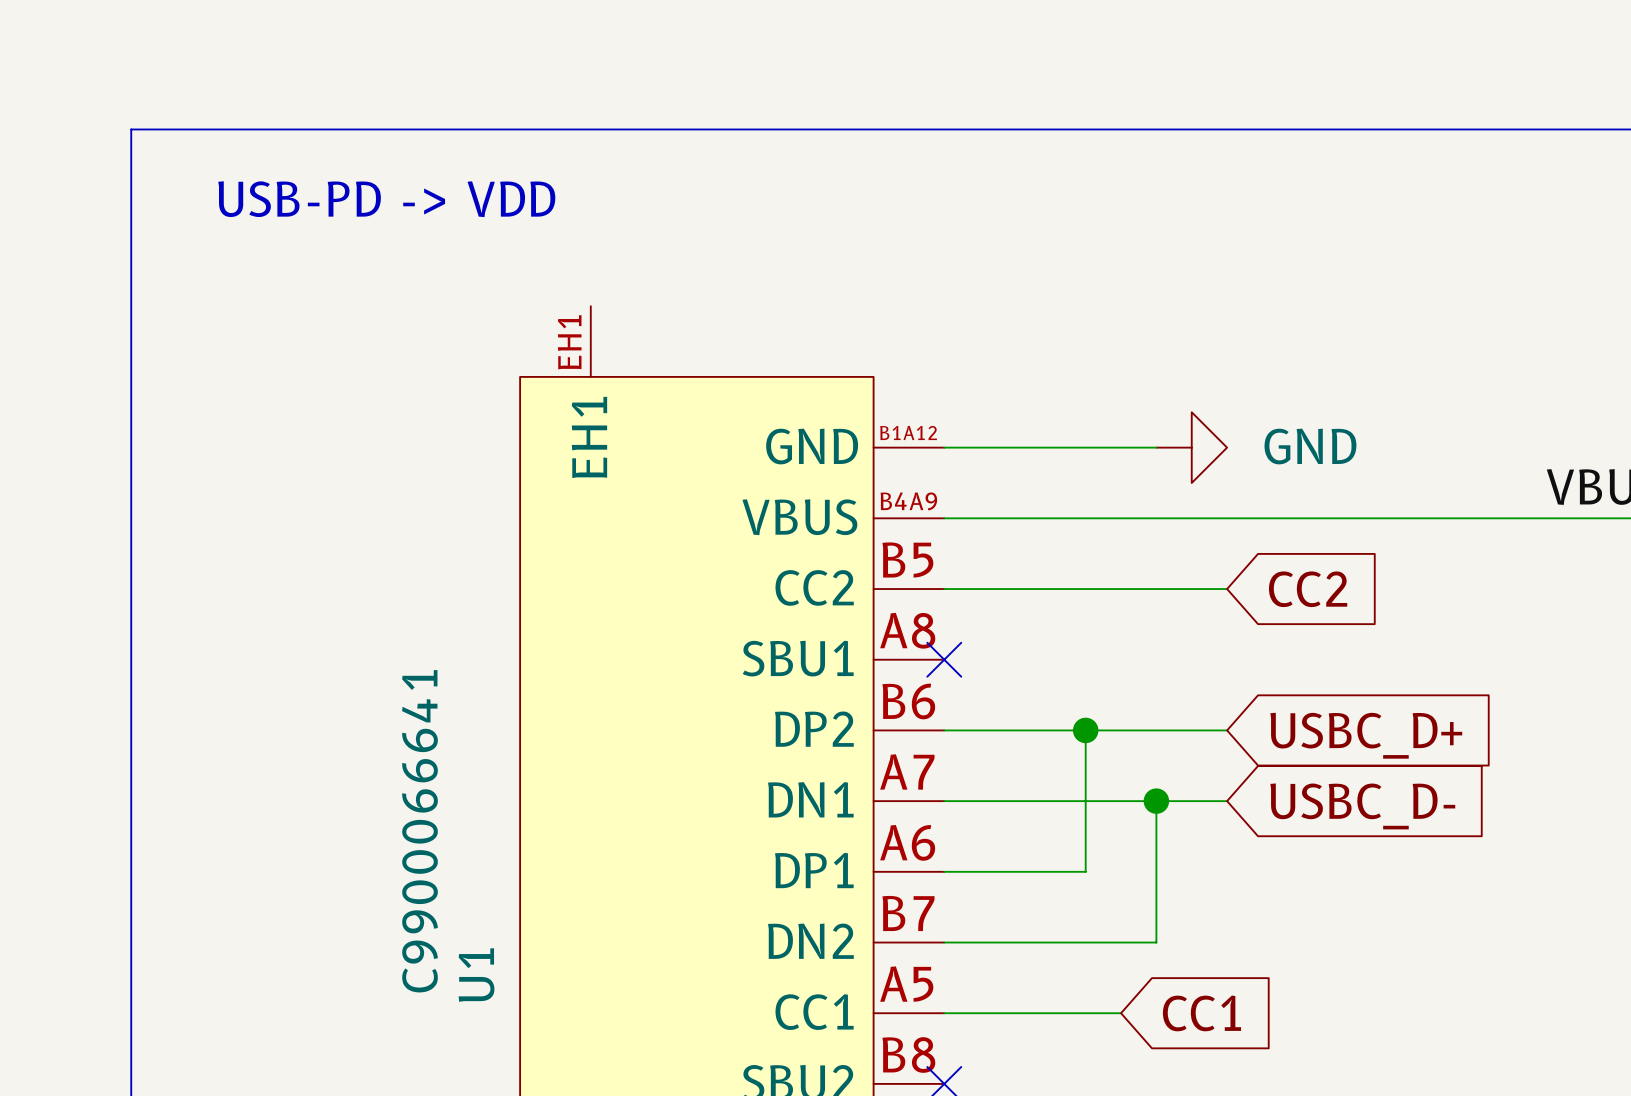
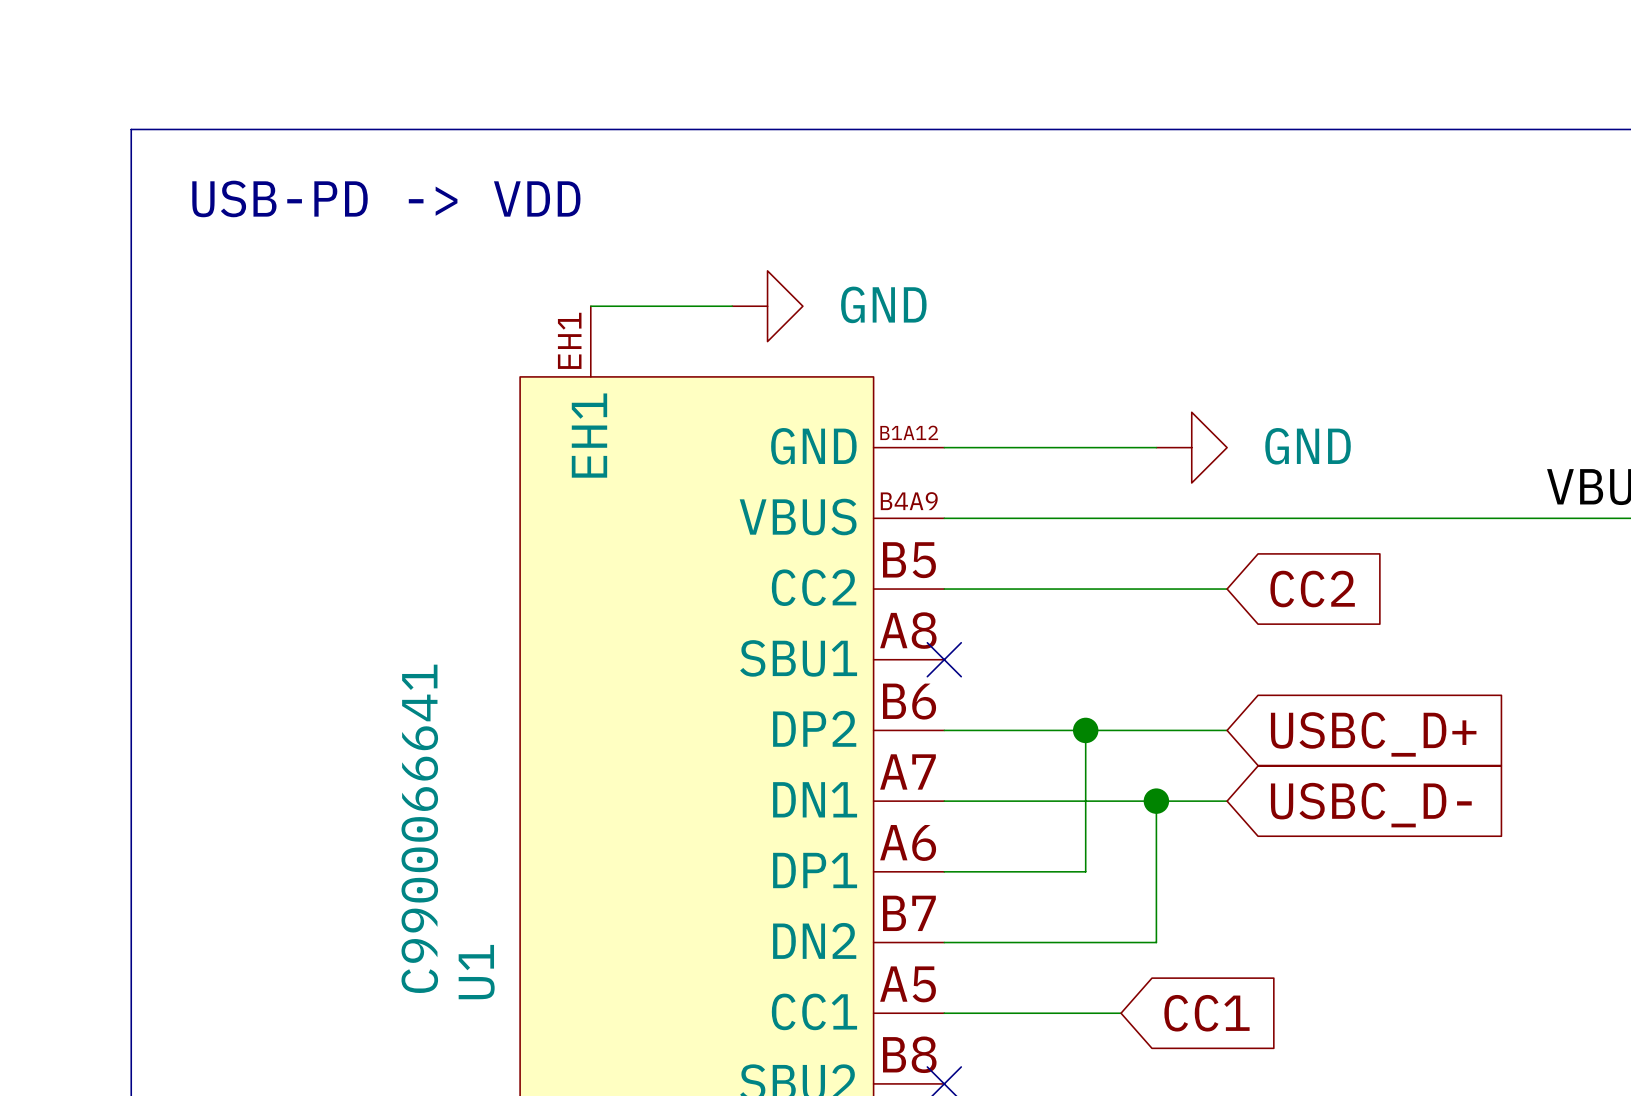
wire: none -> (590, 306) (732, 306)
power symbol: none -> GND (767, 306)

